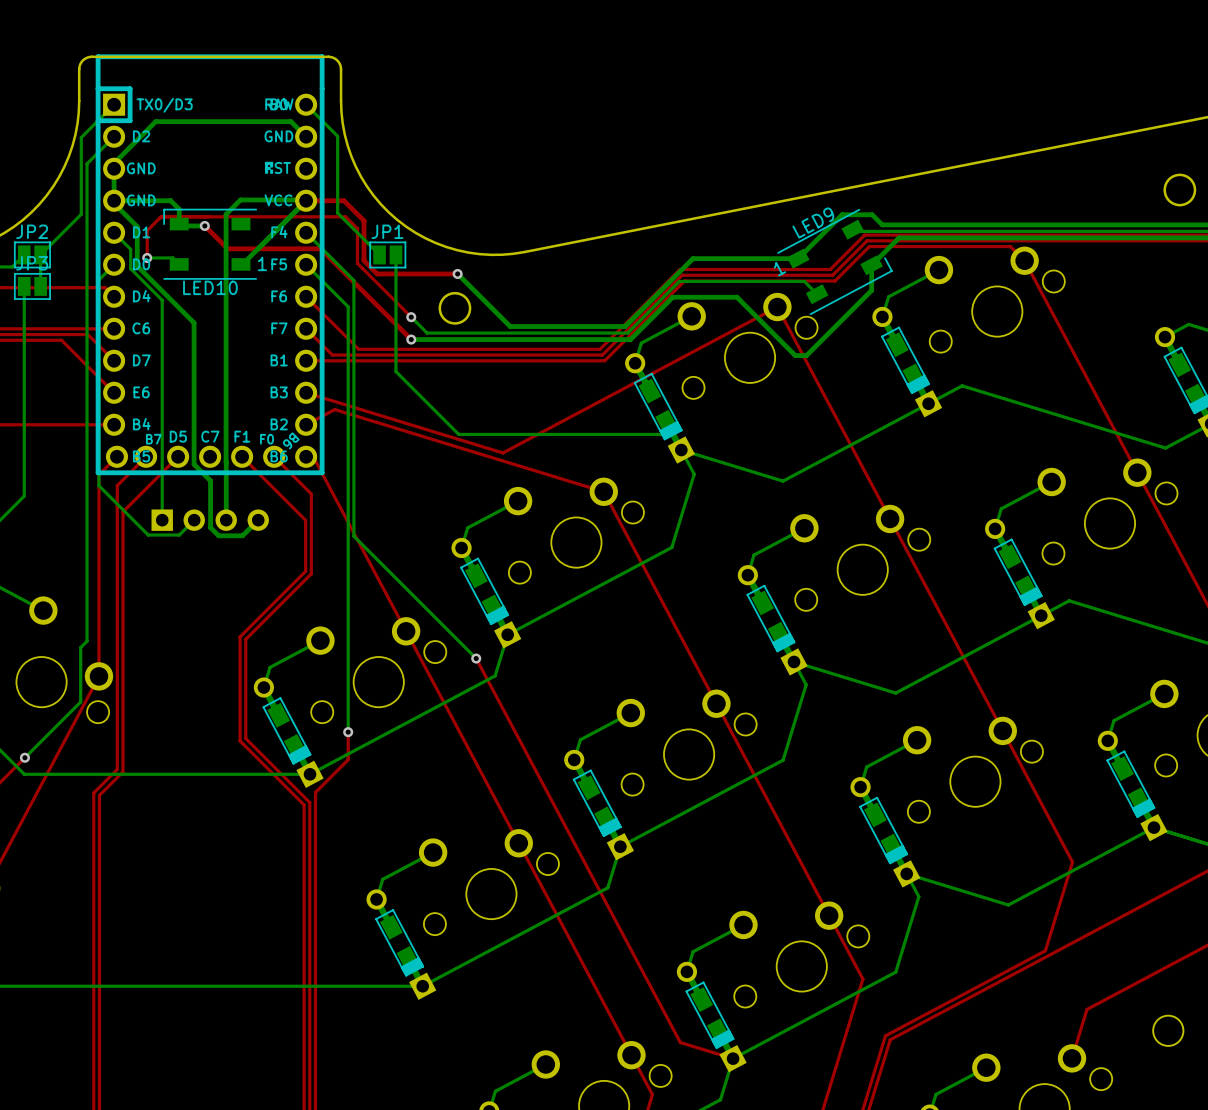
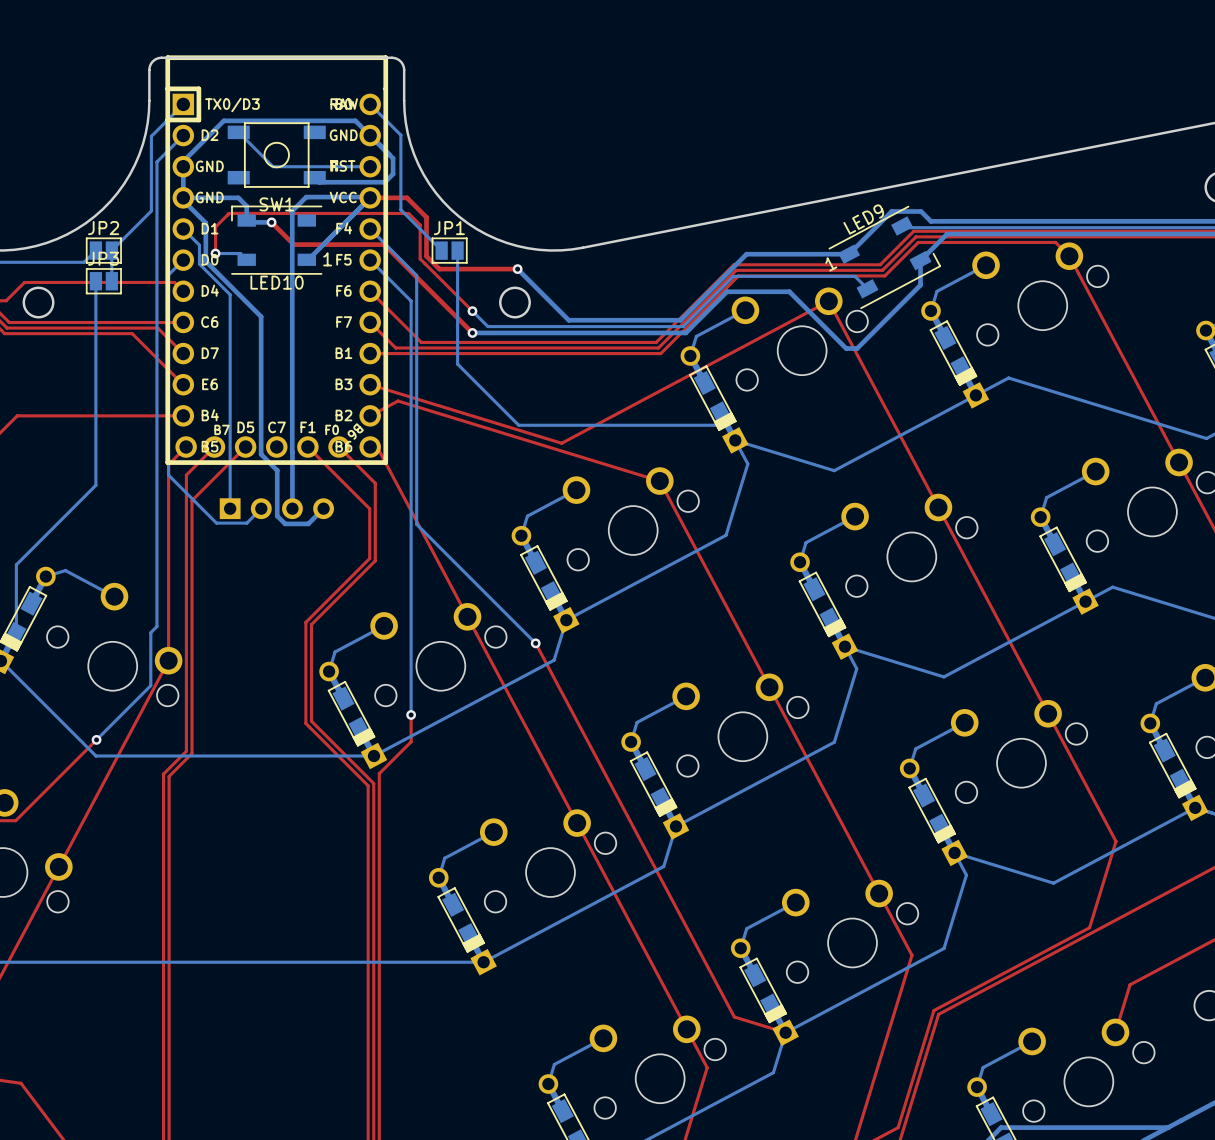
bottom track: none -> (238, 132) (273, 166) (370, 166)
bottom track: none -> (370, 135) (393, 158) (393, 174) (384, 182) (319, 182) (314, 177)
SW1: none -> (276, 155)

